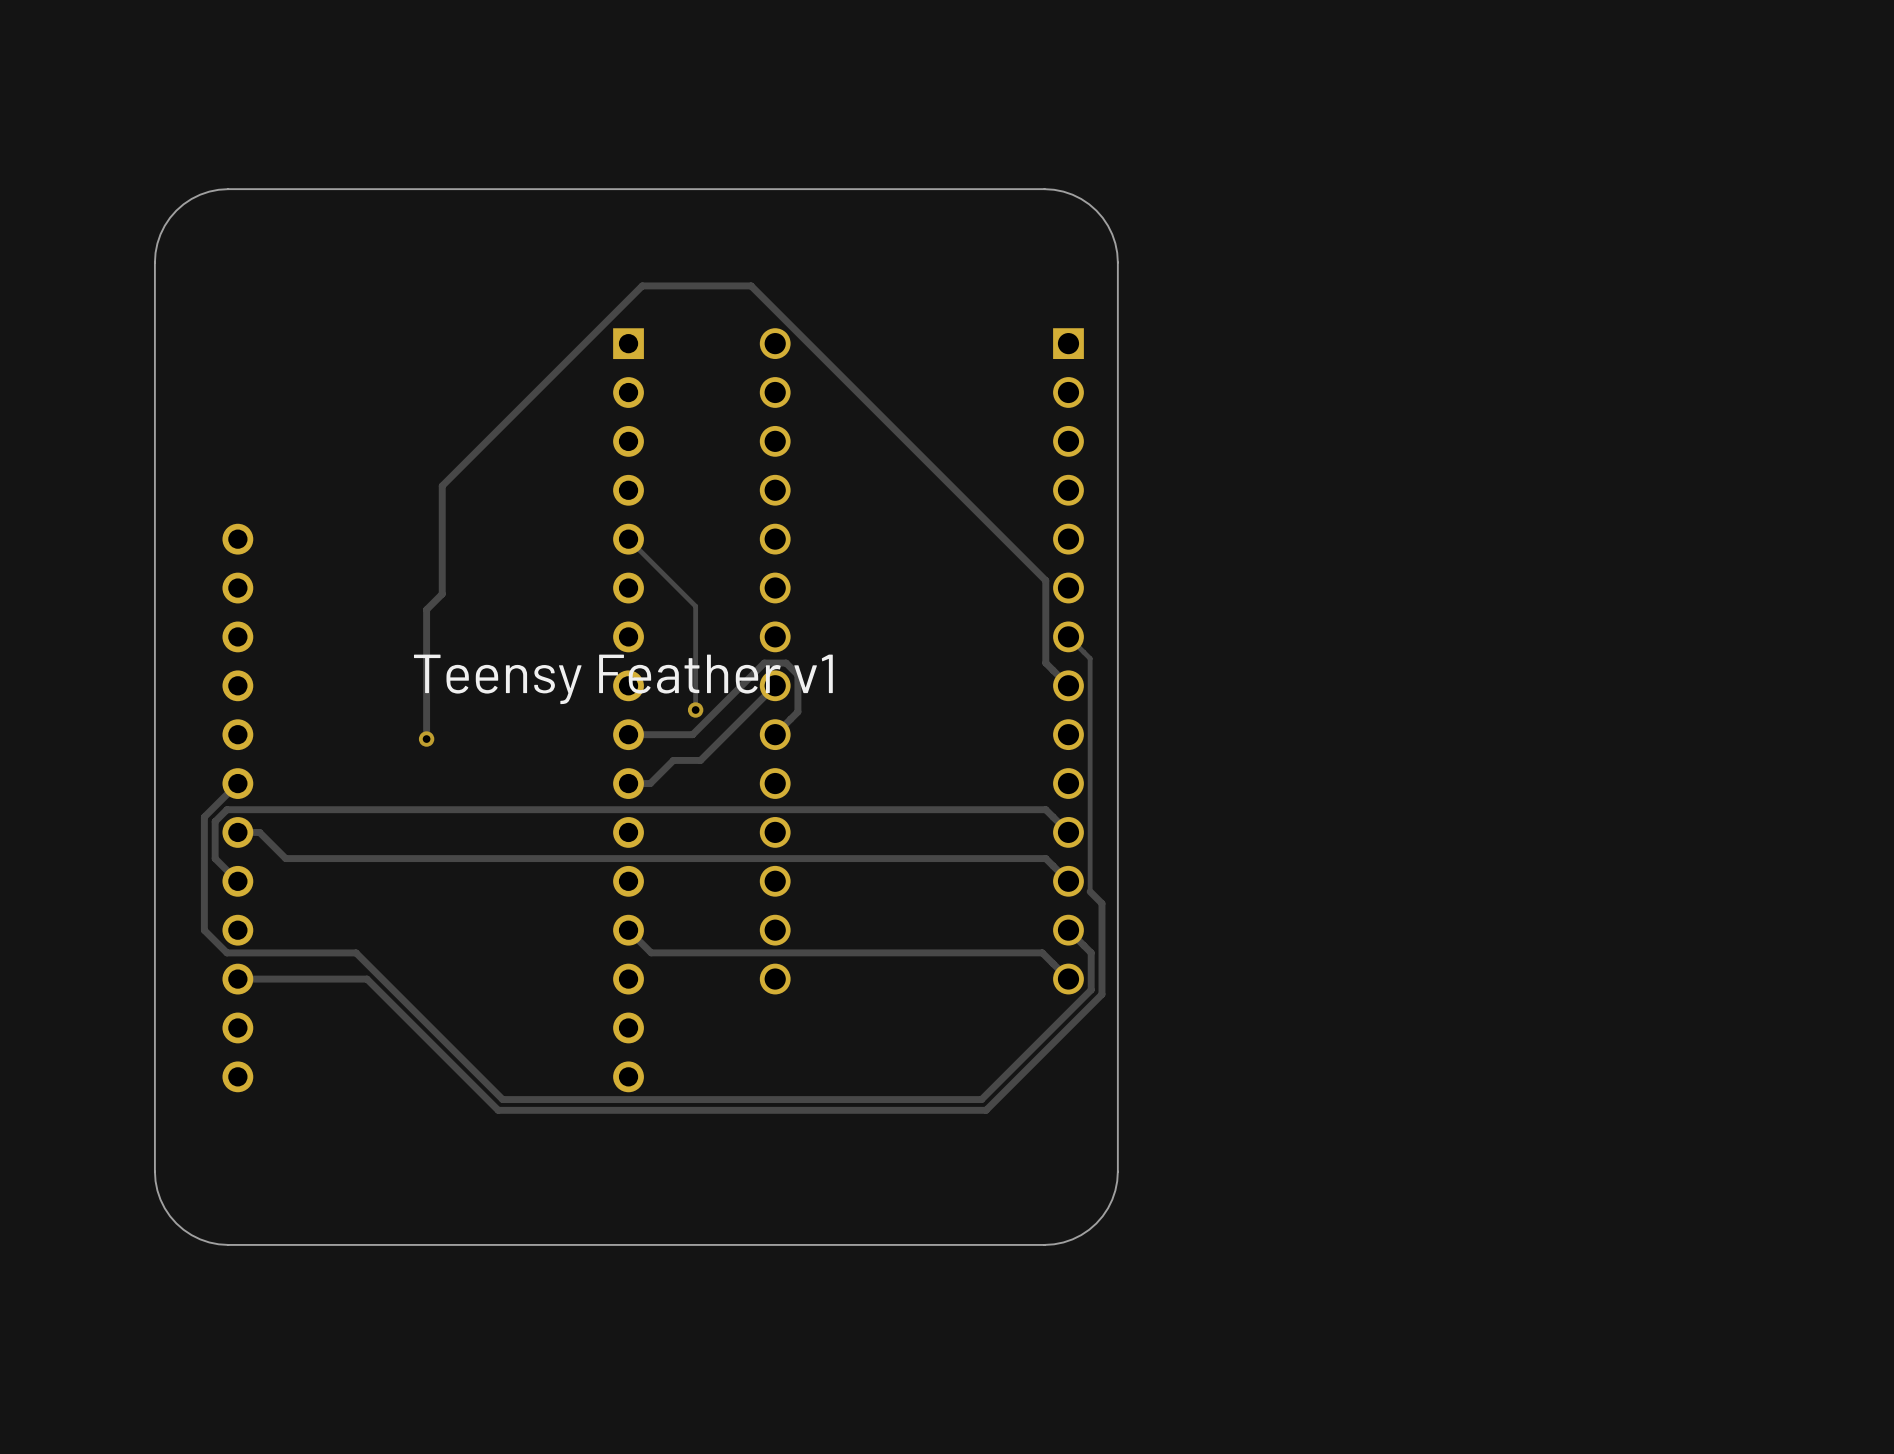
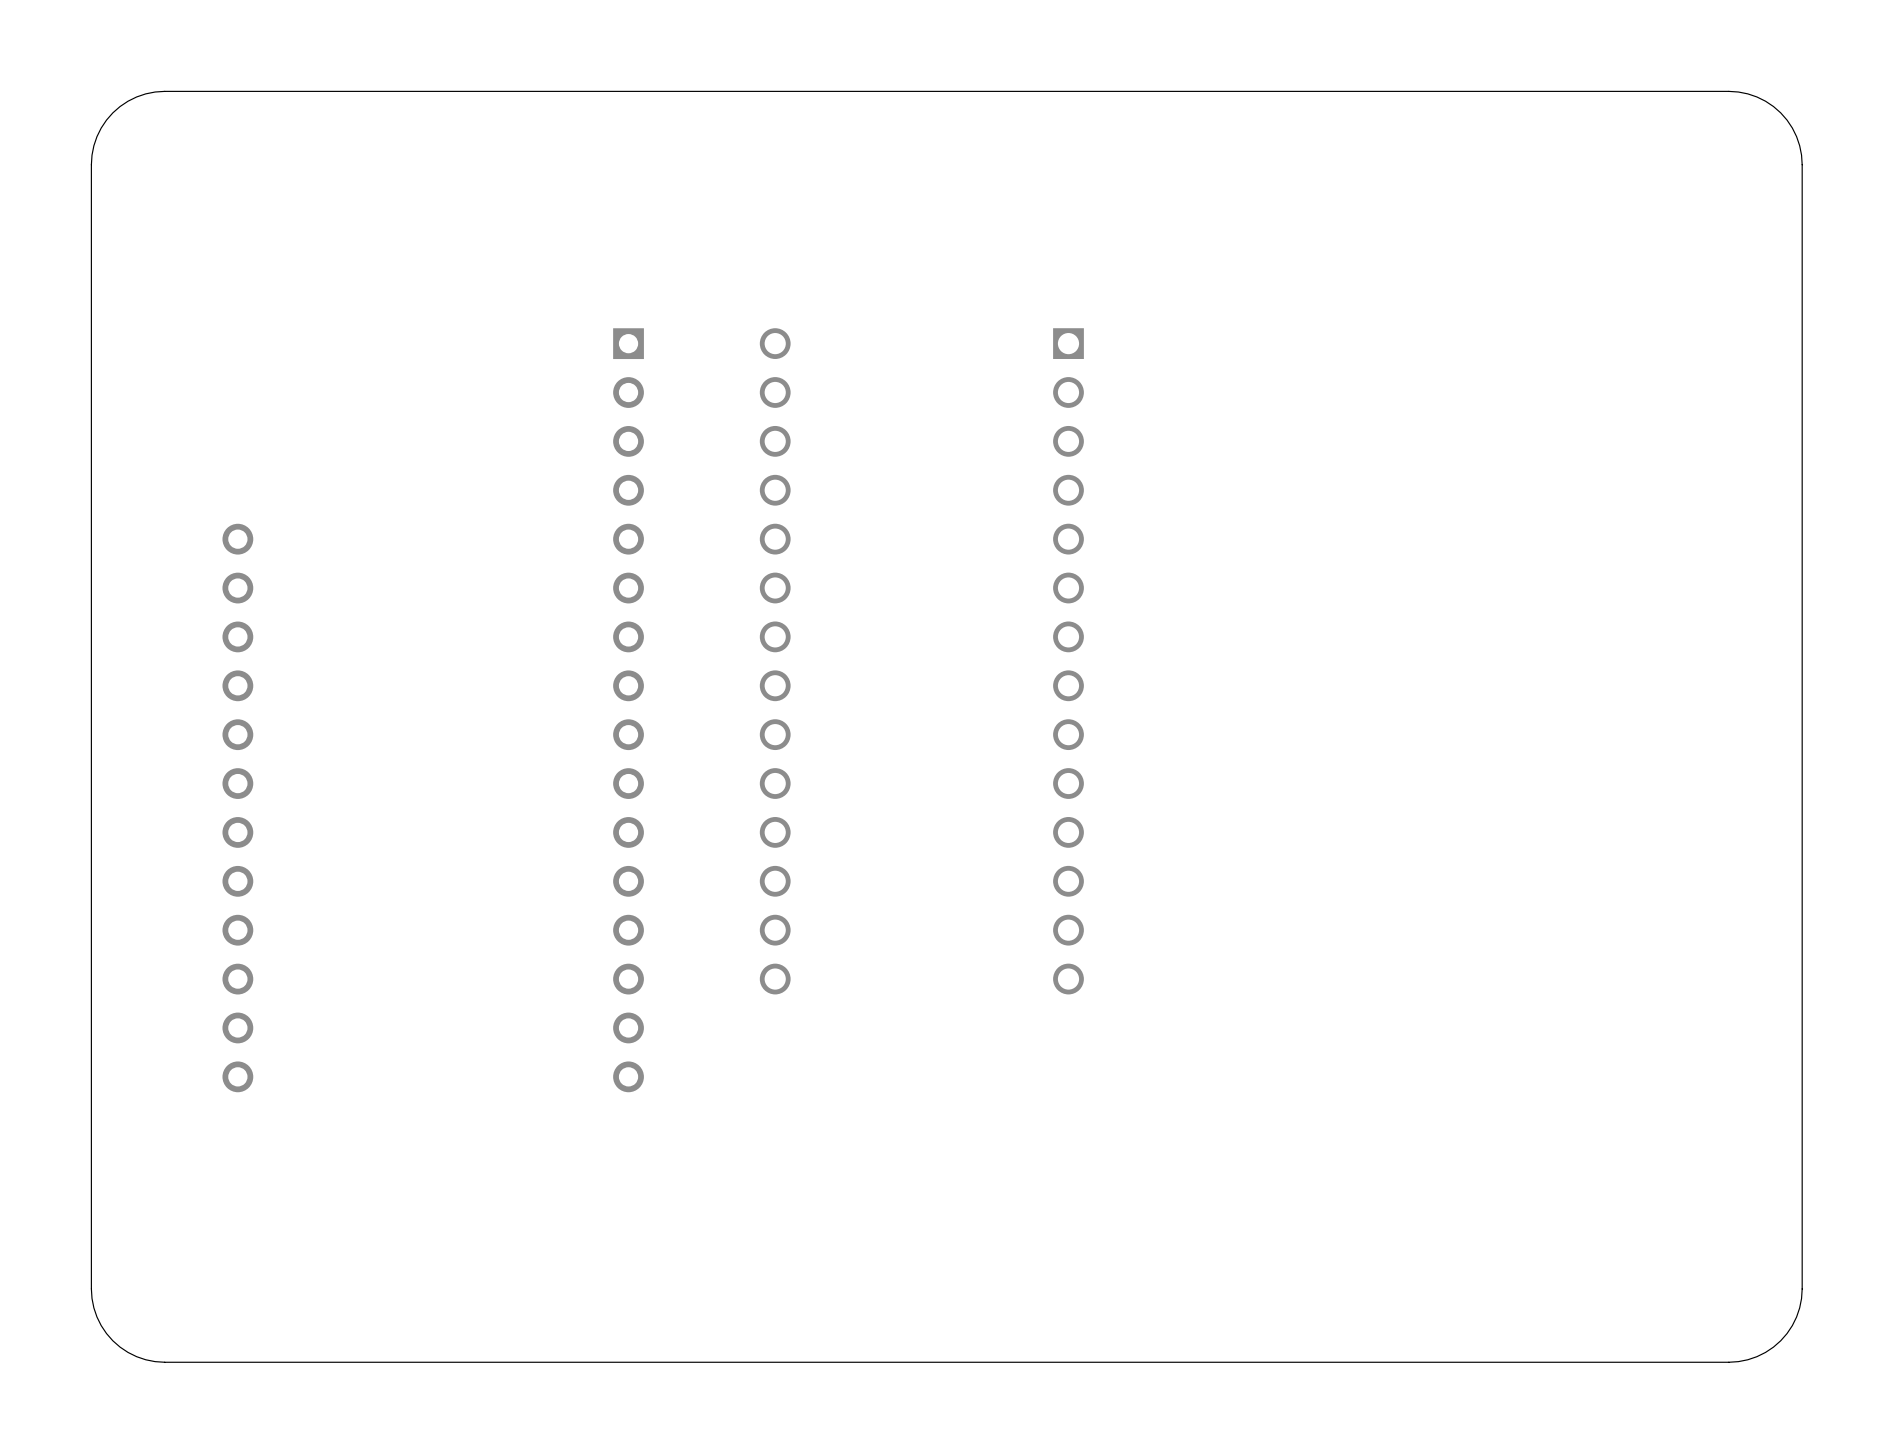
board edge: none -> (1728, 91) (164, 91) (136, 96) (120, 106) (101, 128) (93, 145) (91, 164) (91, 1288) (93, 1307) (106, 1333) (128, 1352) (145, 1359) (164, 1362) (1728, 1362) (1747, 1359) (1773, 1347) (1787, 1333) (1796, 1317) (1802, 1288) (1802, 164) (1796, 136) (1780, 112) (1756, 96) (1728, 91)
board edge: (1044, 189) (228, 189) (200, 194) (183, 204) (170, 217) (157, 243) (154, 262) (154, 1171) (157, 1190) (164, 1208) (183, 1229) (209, 1242) (228, 1244) (1044, 1244) (1063, 1242) (1081, 1235) (1102, 1216) (1115, 1190) (1117, 1171) (1117, 262) (1112, 234) (1096, 210) (1072, 194) (1044, 189) -> none
track: (628, 539) (695, 606) (695, 710) -> none
track: (1068, 636) (1090, 658) (1090, 891) (1101, 903) (1101, 994) (986, 1110) (498, 1110) (367, 979) (237, 979) -> none
text: Teensy Feather v1 (623, 679) -> none
track: (775, 685) (700, 760) (673, 760) (650, 783) (628, 783) -> none
track: (1068, 685) (1045, 663) (1045, 580) (751, 285) (642, 285) (442, 485) (442, 594) (426, 609) (426, 739) -> none
via: (695, 710) -> none
track: (775, 734) (797, 711) (797, 674) (786, 663) (764, 663) (692, 734) (628, 734) -> none
via: (426, 739) -> none
track: (237, 783) (204, 817) (204, 930) (226, 952) (356, 952) (502, 1099) (981, 1099) (1091, 989) (1091, 952) (1068, 930) -> none
track: (237, 832) (259, 832) (285, 858) (1045, 858) (1068, 881) -> none
track: (1068, 832) (1045, 809) (227, 809) (215, 821) (215, 858) (237, 881) -> none
track: (628, 930) (651, 952) (1042, 952) (1068, 979) -> none

